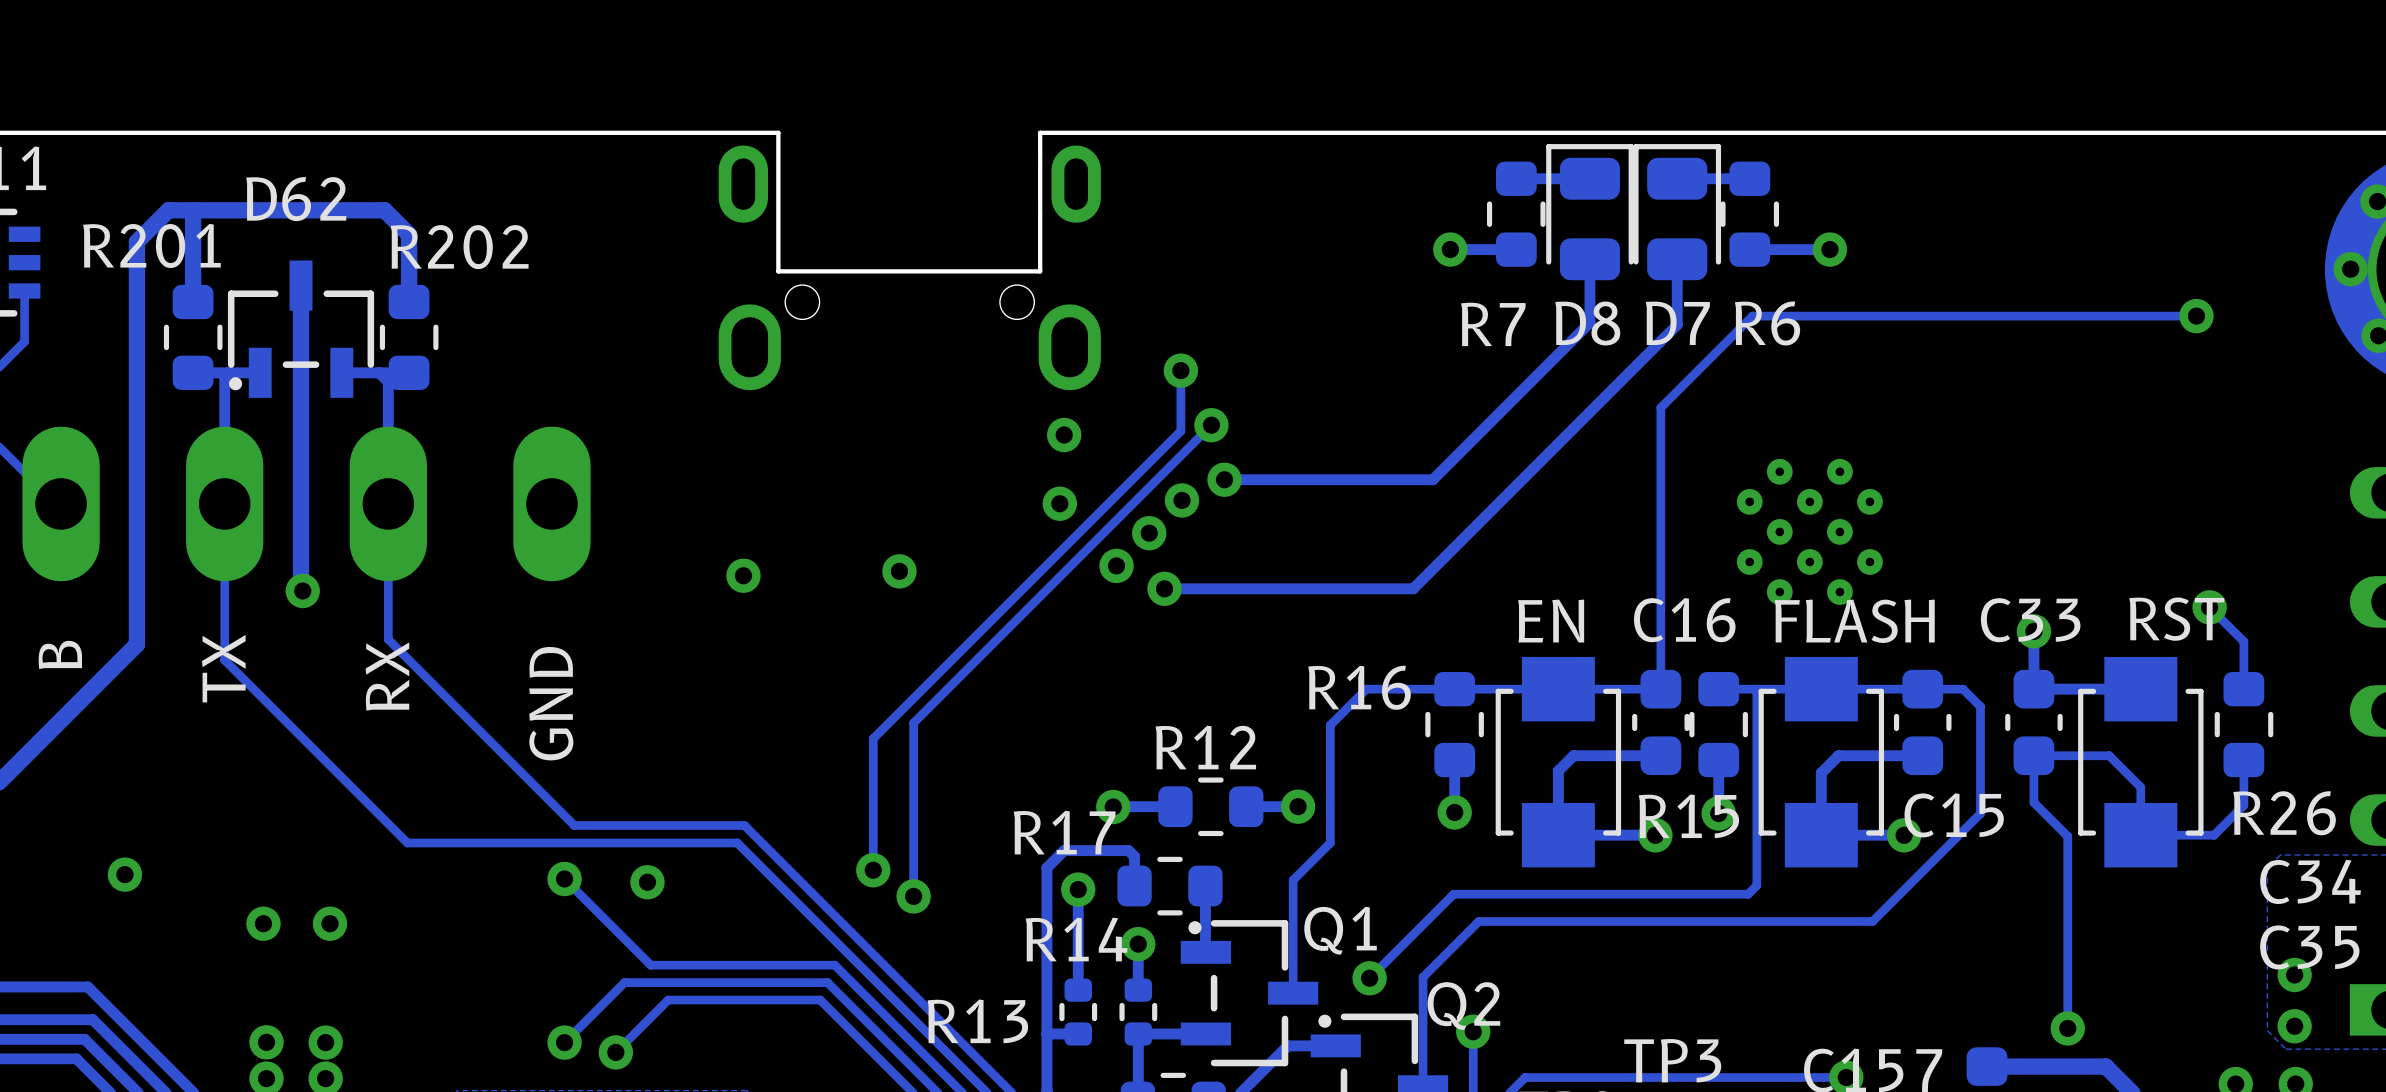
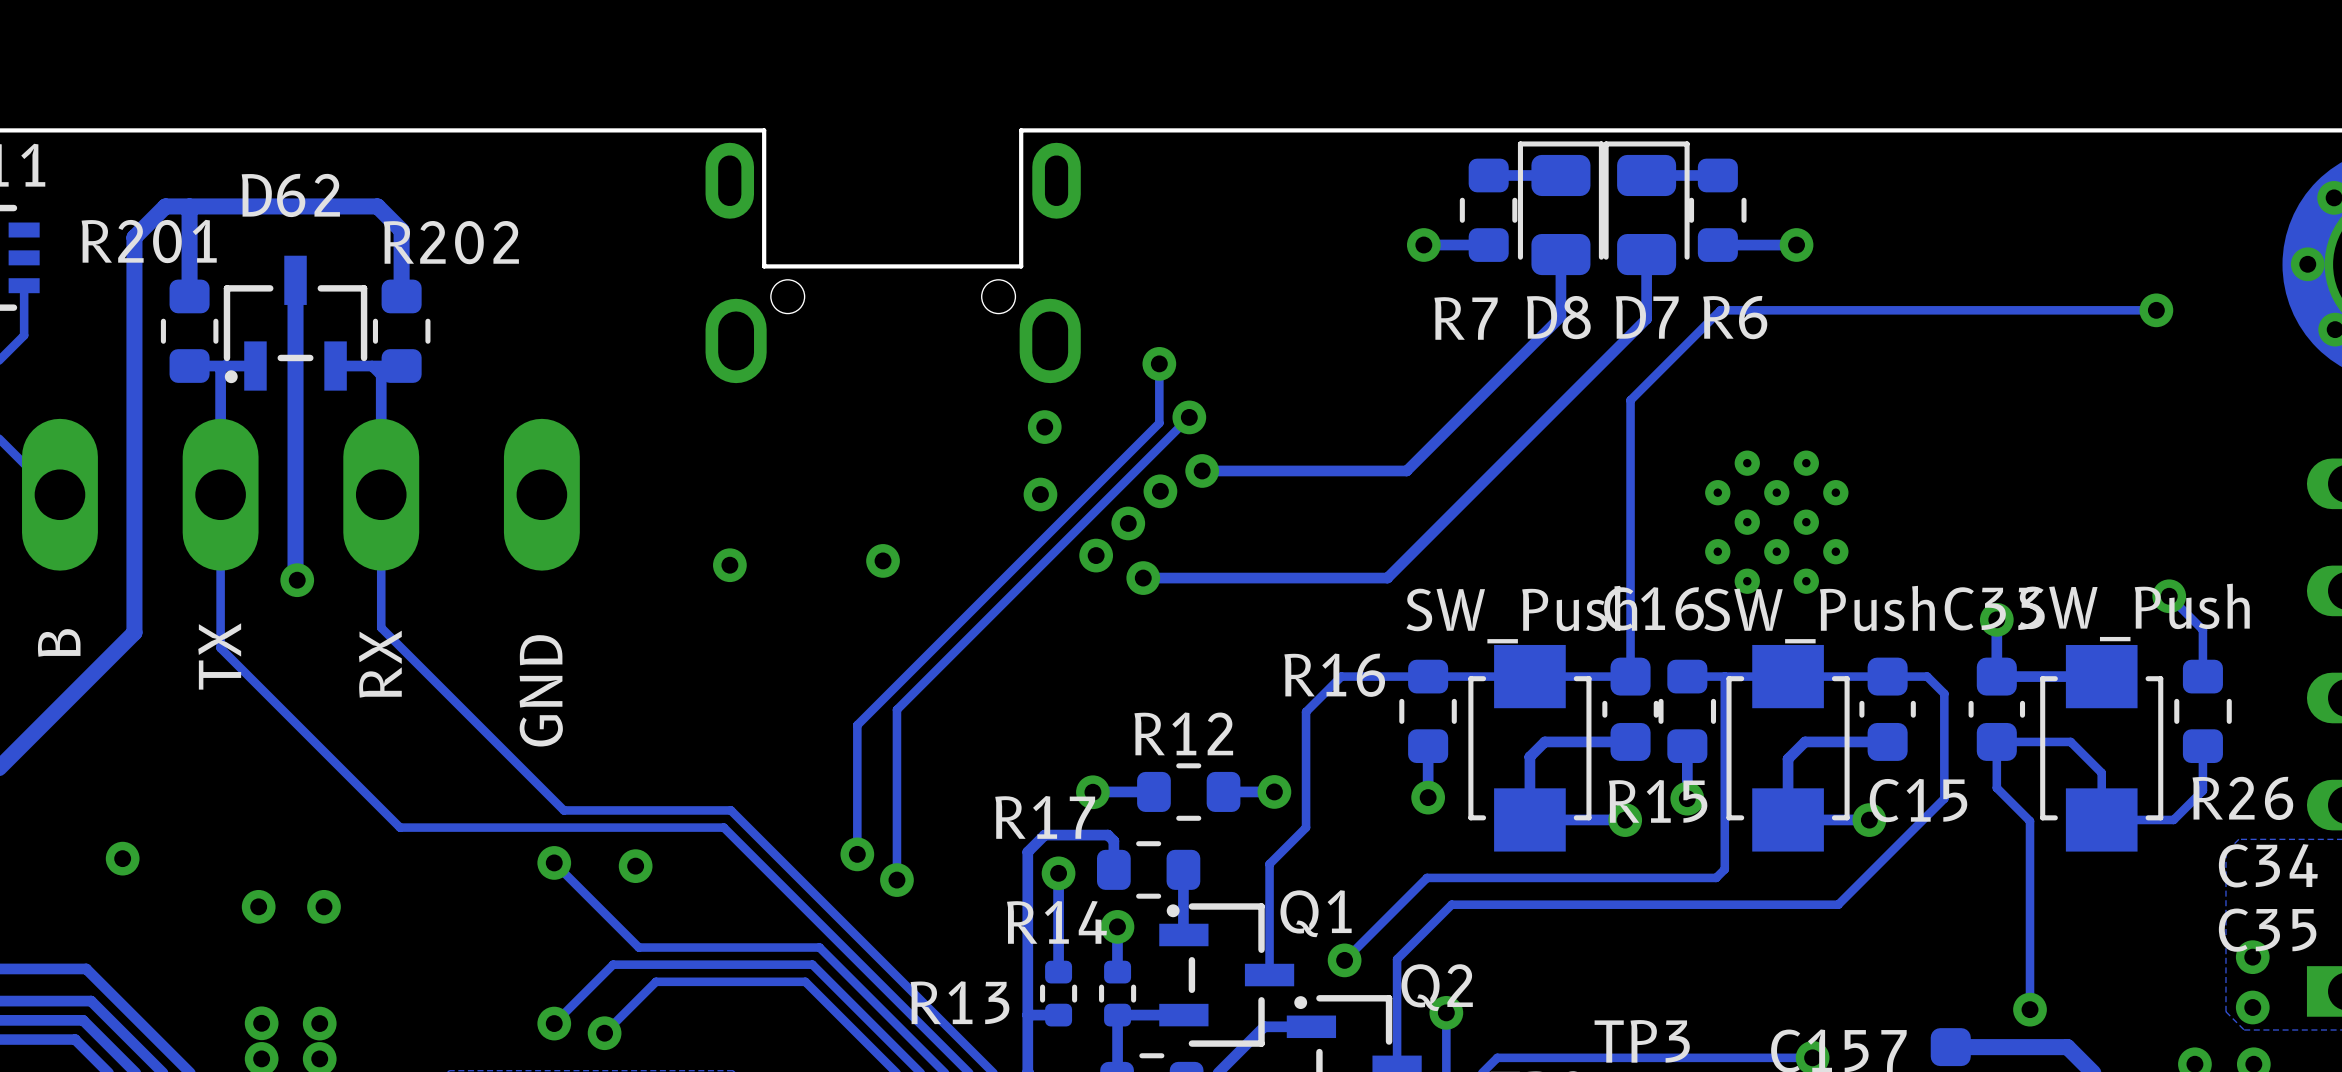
part value: RST (2176, 619) -> SW_Push (2134, 612)
part value: EN (1551, 621) -> SW_Push (1521, 614)
part value: FLASH (1854, 621) -> SW_Push (1819, 614)

